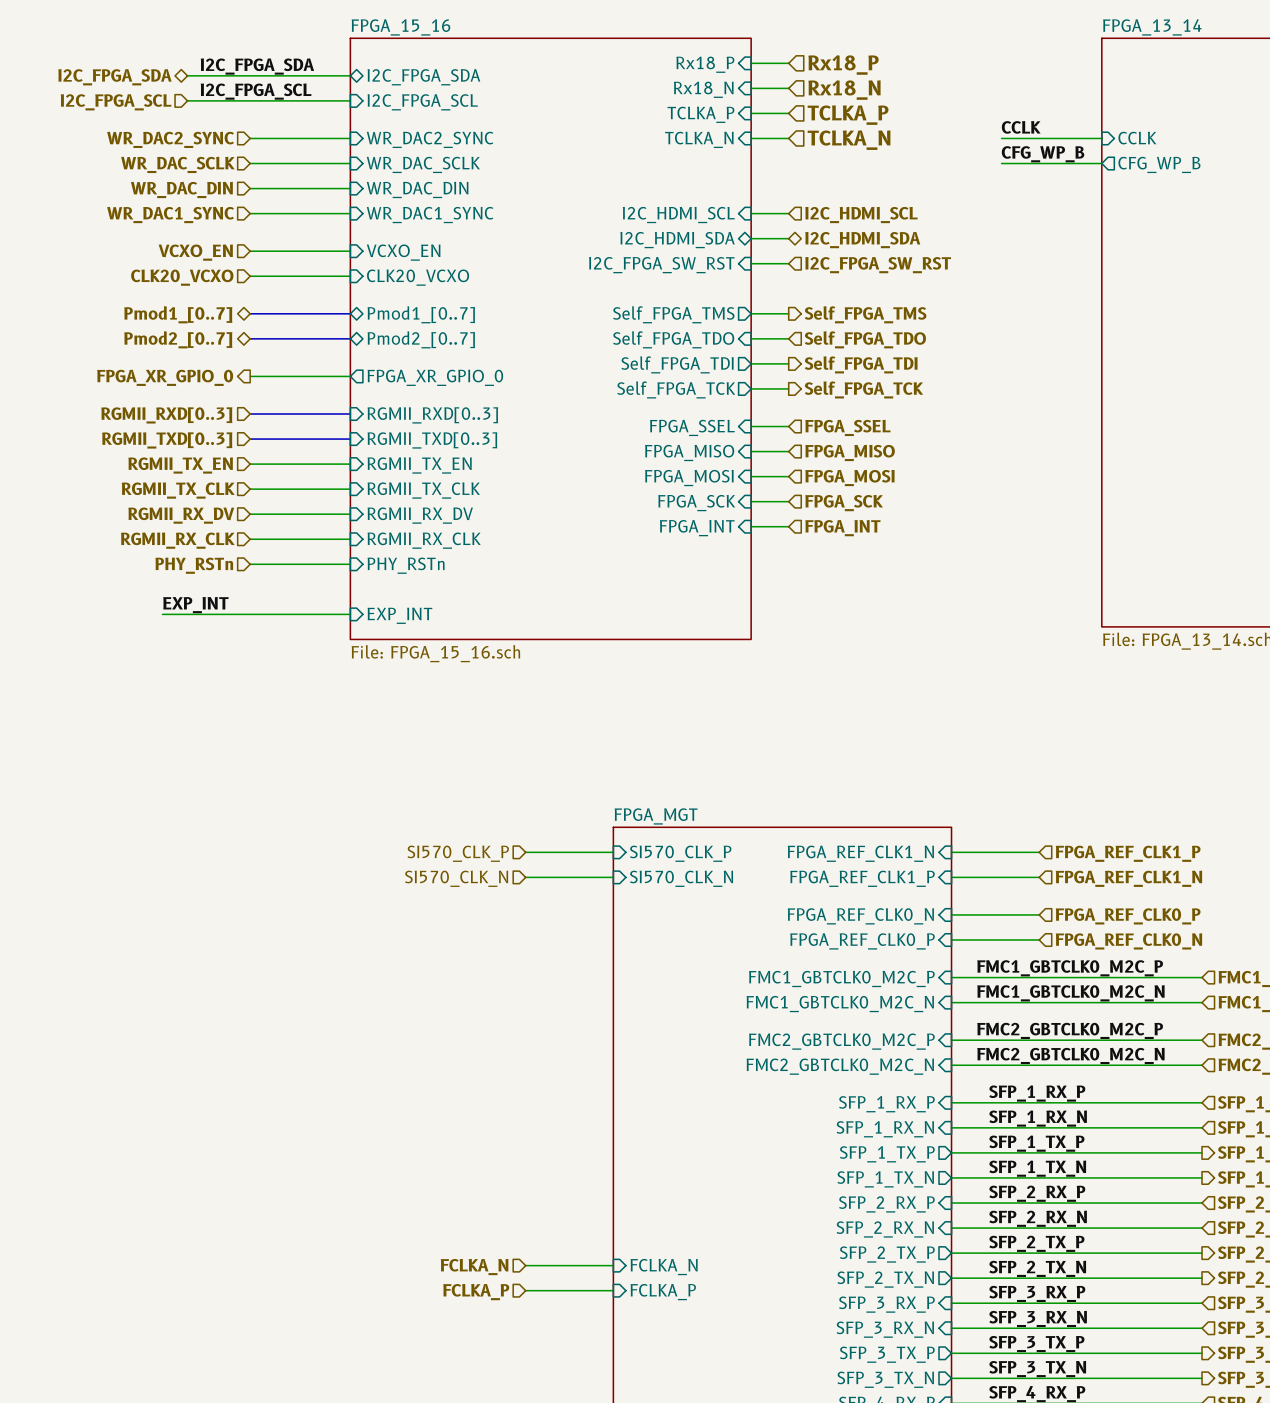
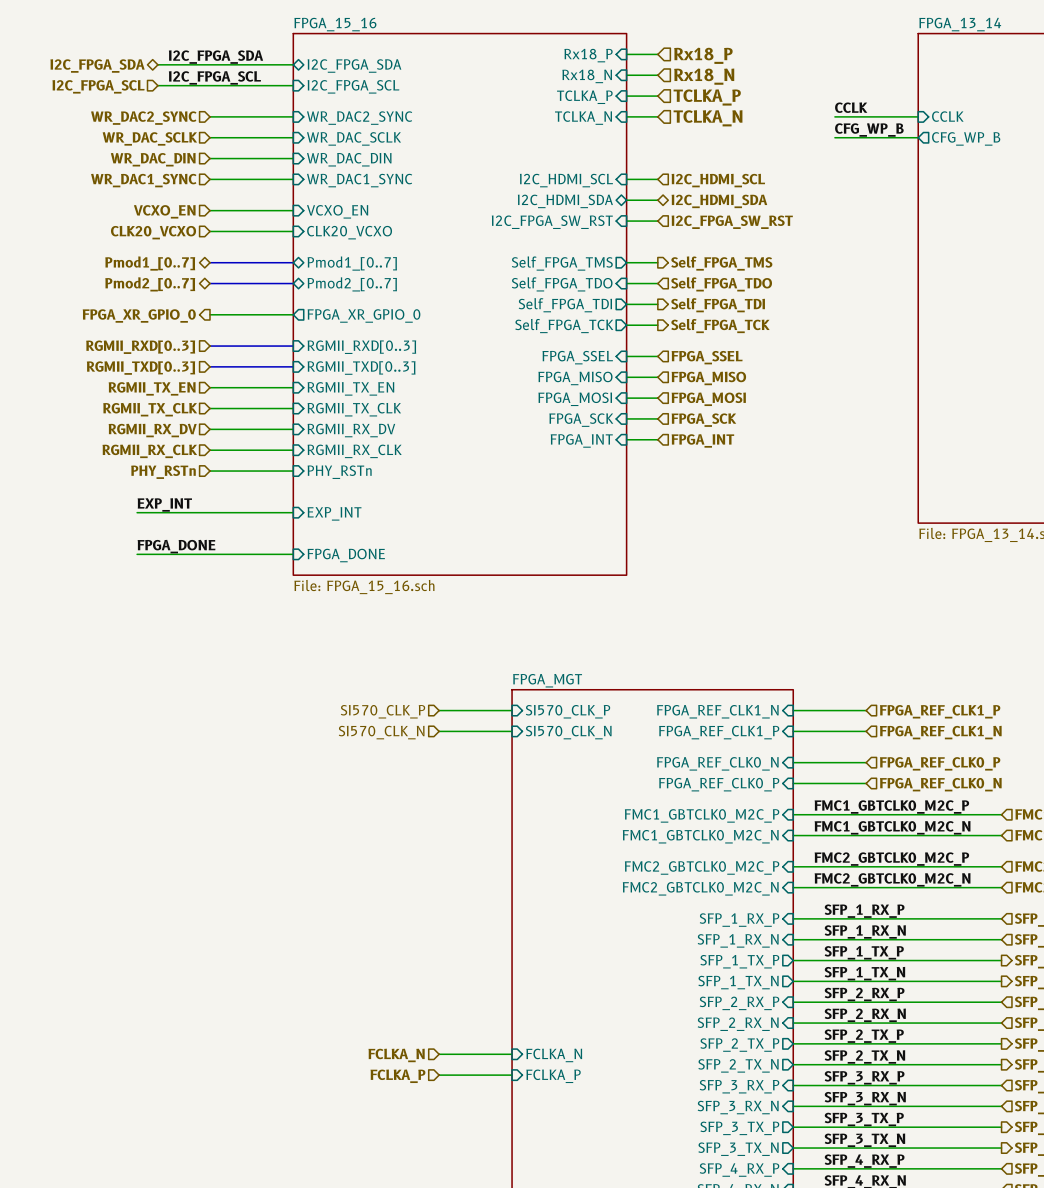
sheet FPGA_15_16 shape: [350, 38, 752, 640] -> [293, 33, 627, 576]
sheet FPGA_15_16 value position: File: FPGA_15_16.sch (435, 653) -> File: FPGA_15_16.sch (364, 587)
label: none -> FPGA_DONE (176, 546)
wire: none -> (137, 554) (293, 554)
sheet pin: none -> FPGA_DONE (346, 555)

